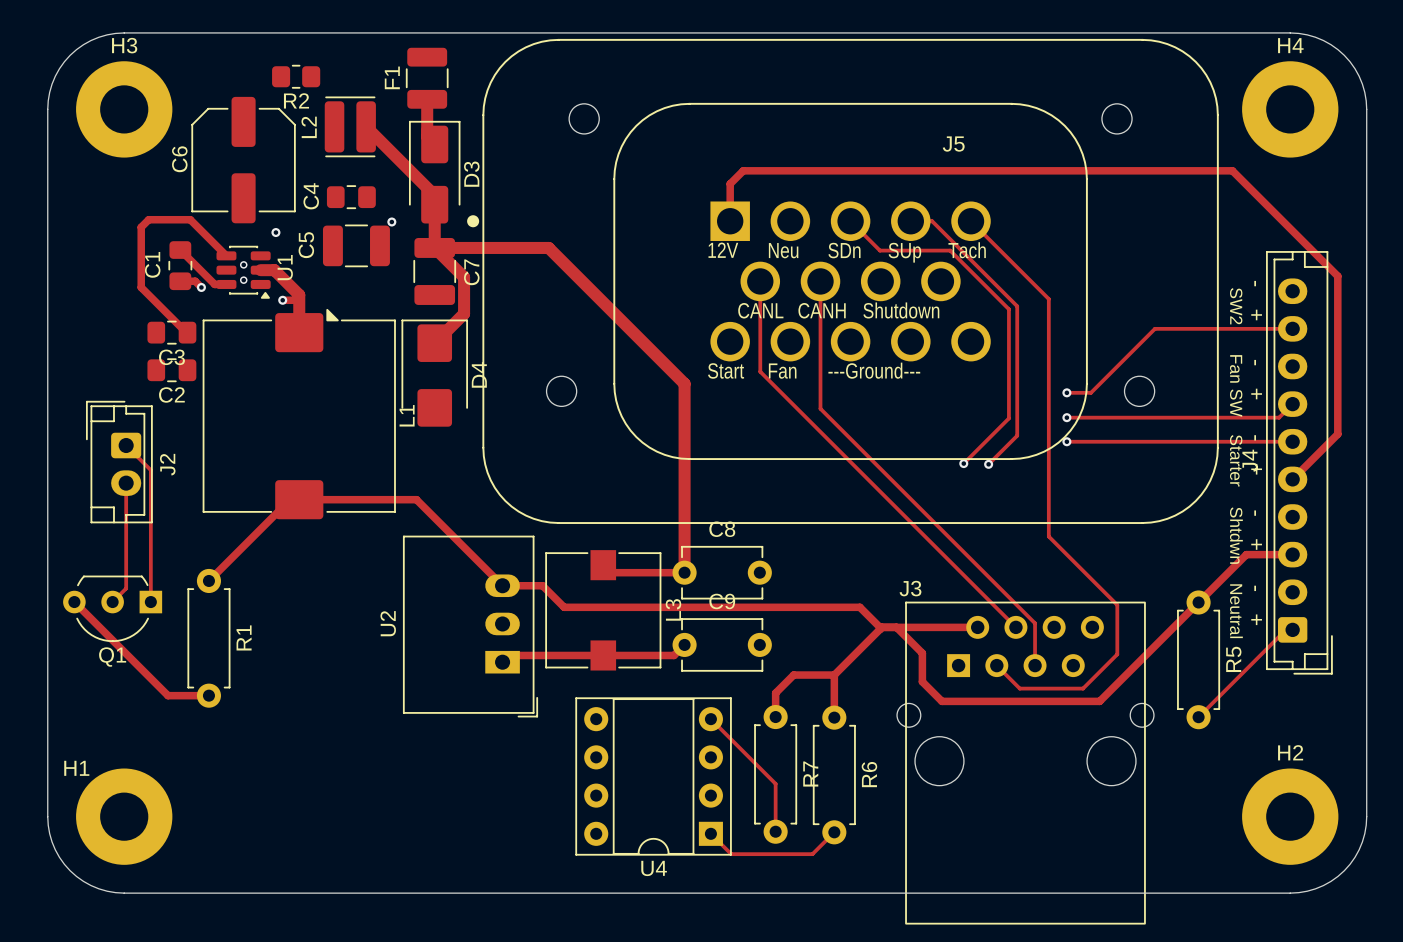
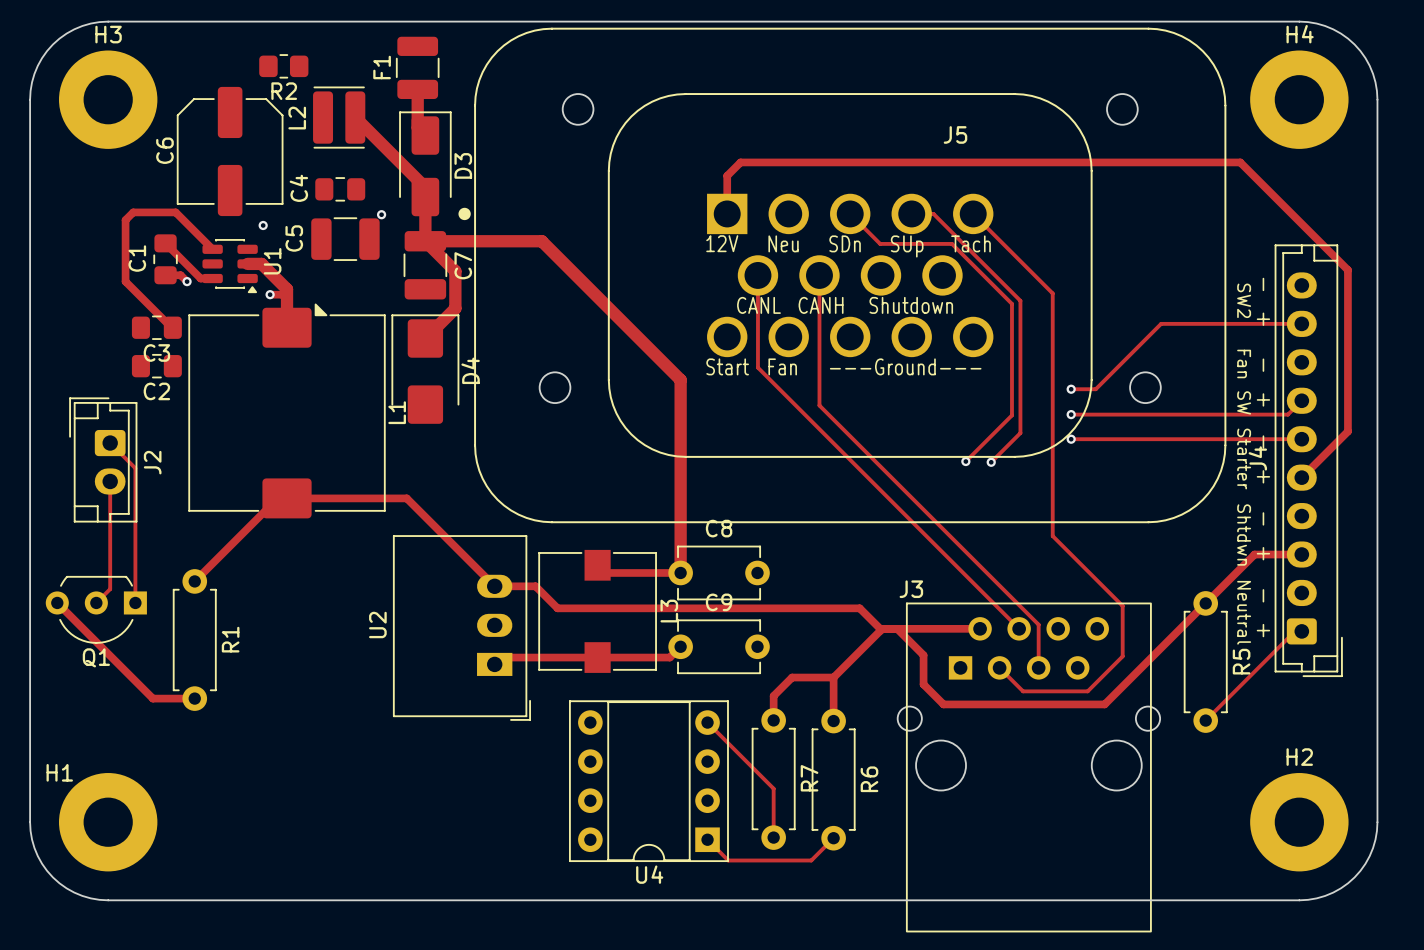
via: (243, 264) -> none
via: (243, 280) -> none

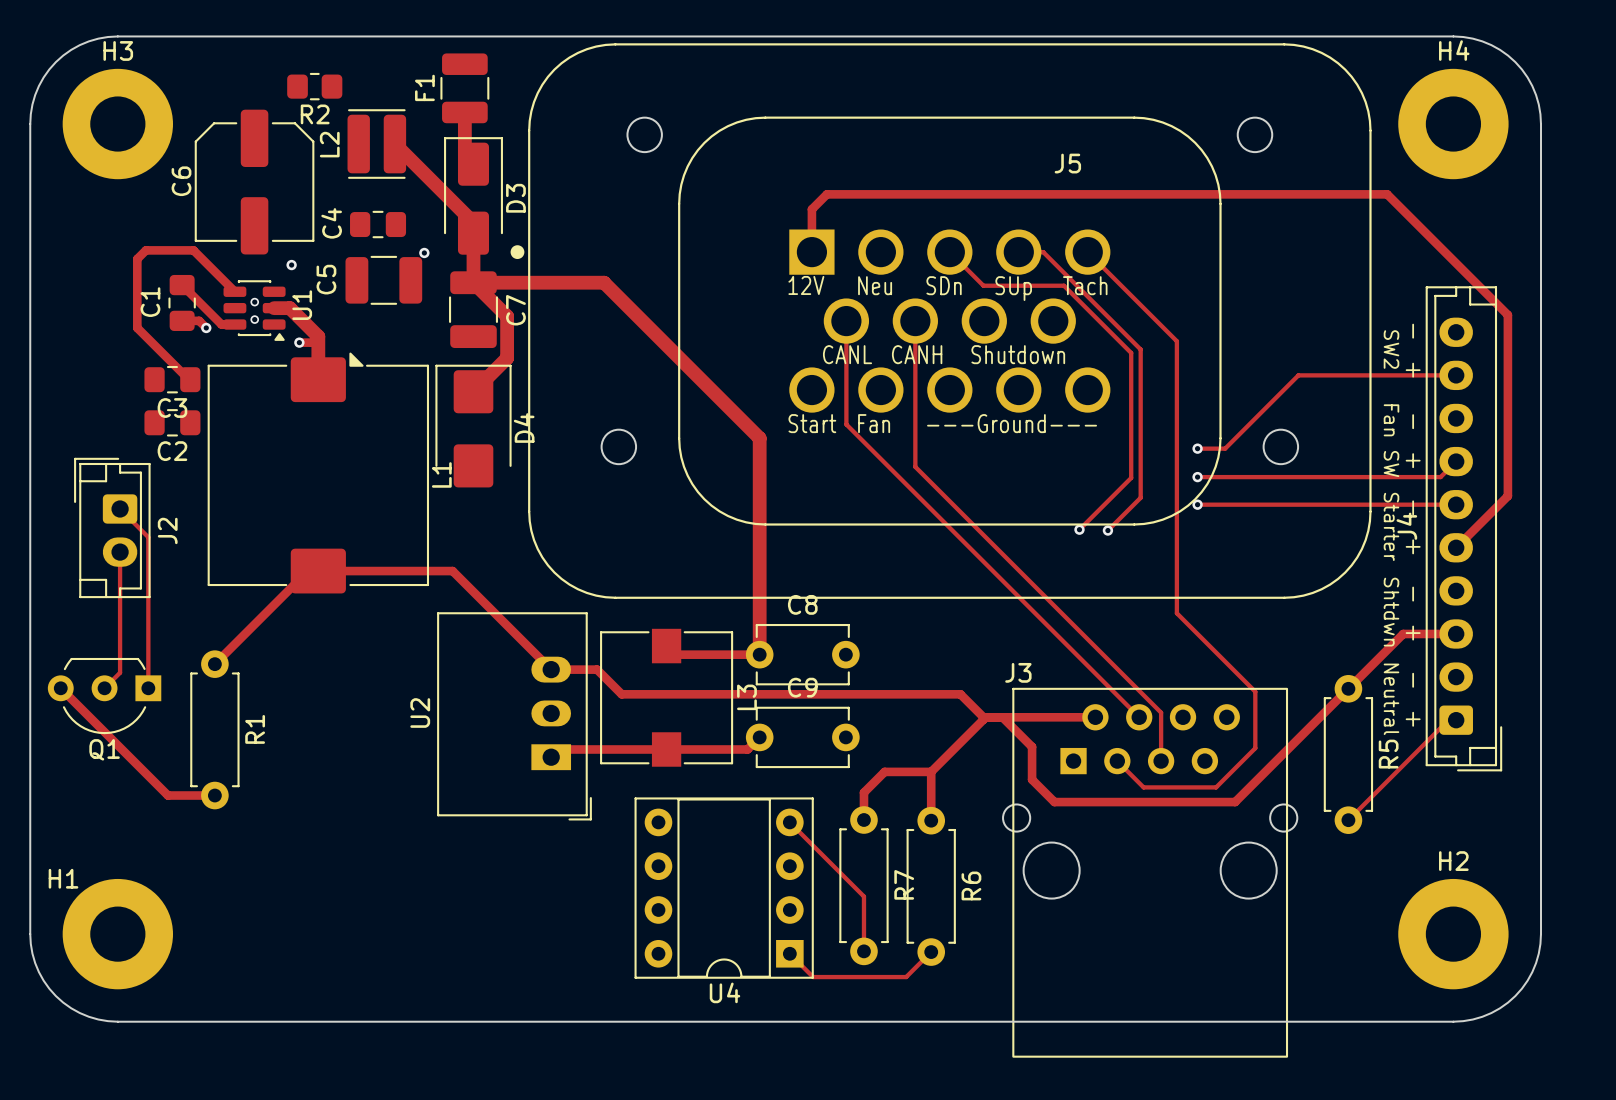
via: none -> (254, 302)
via: none -> (254, 319)

